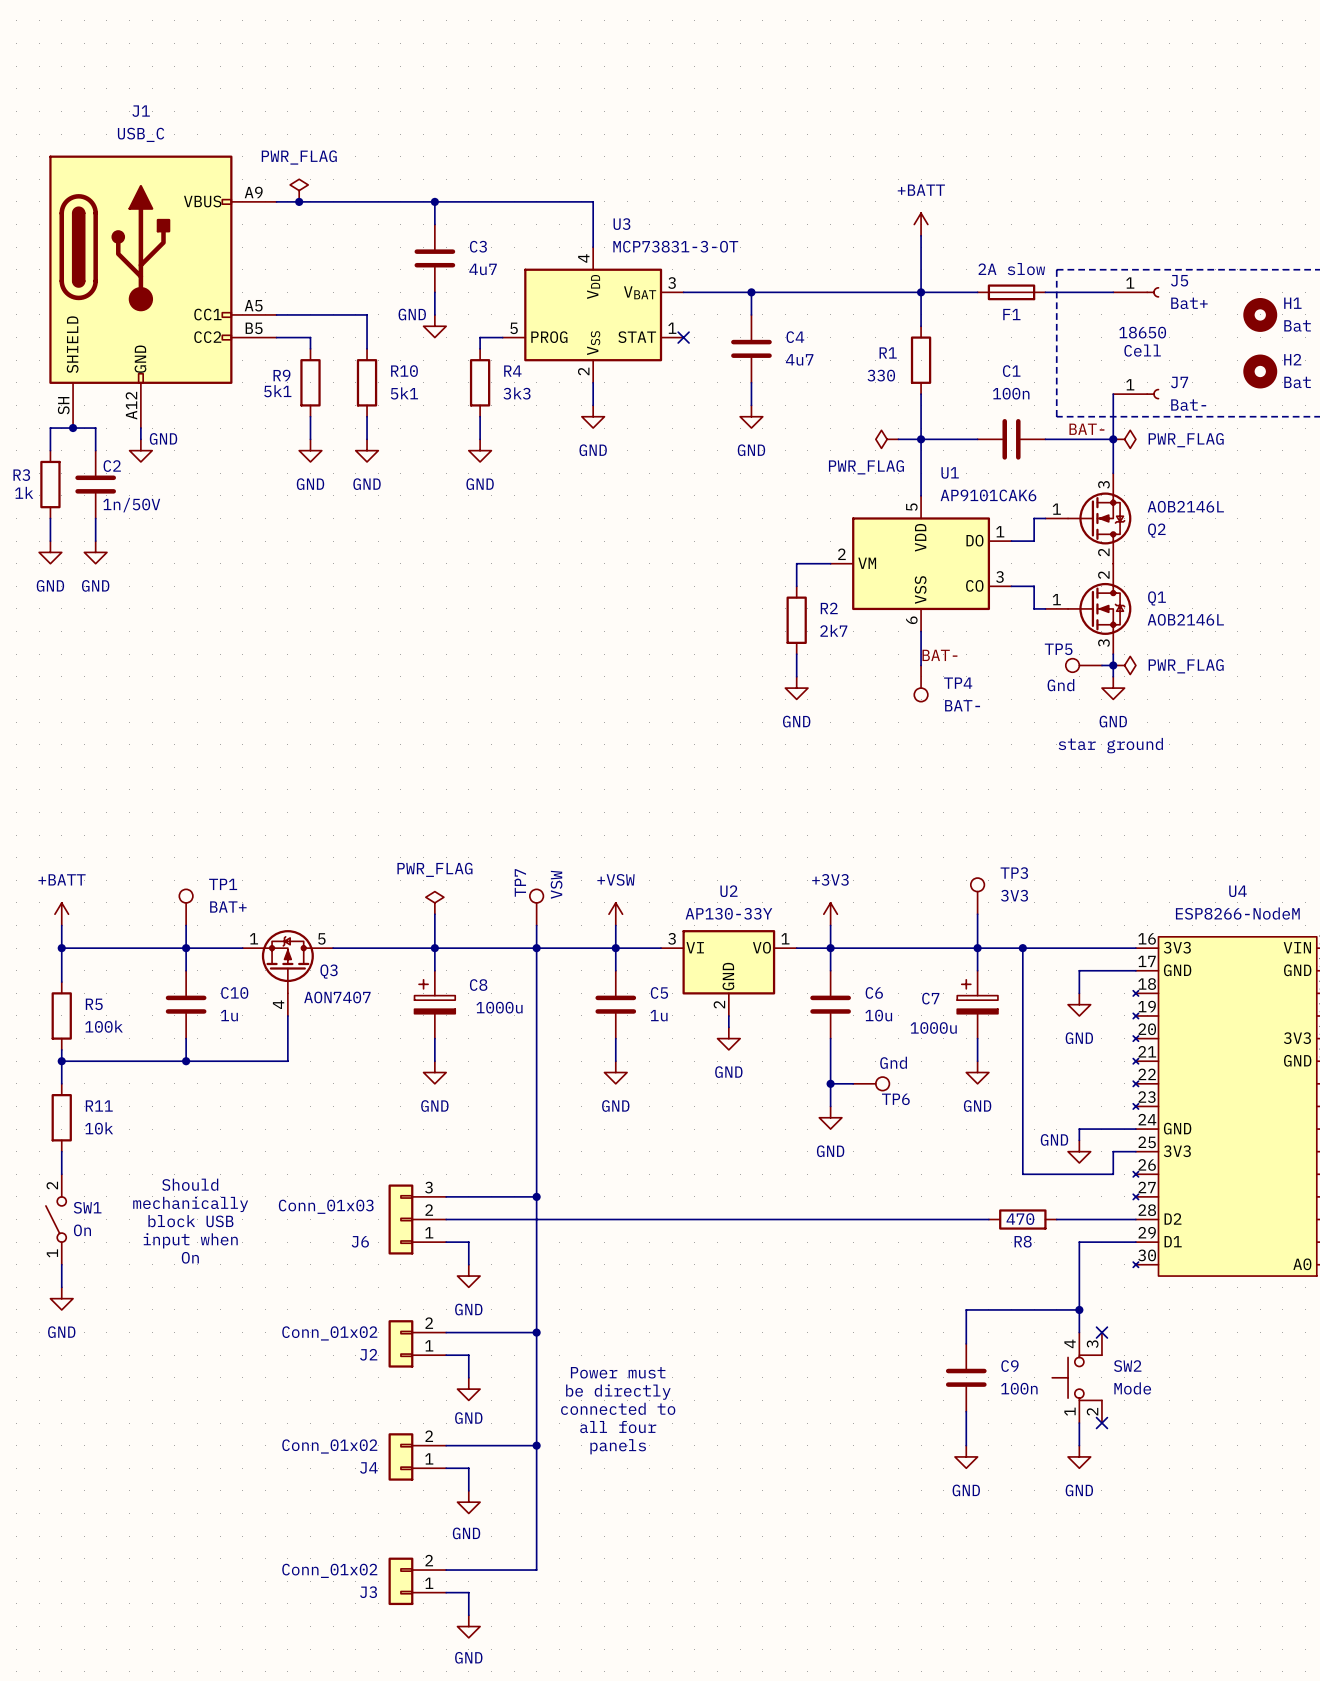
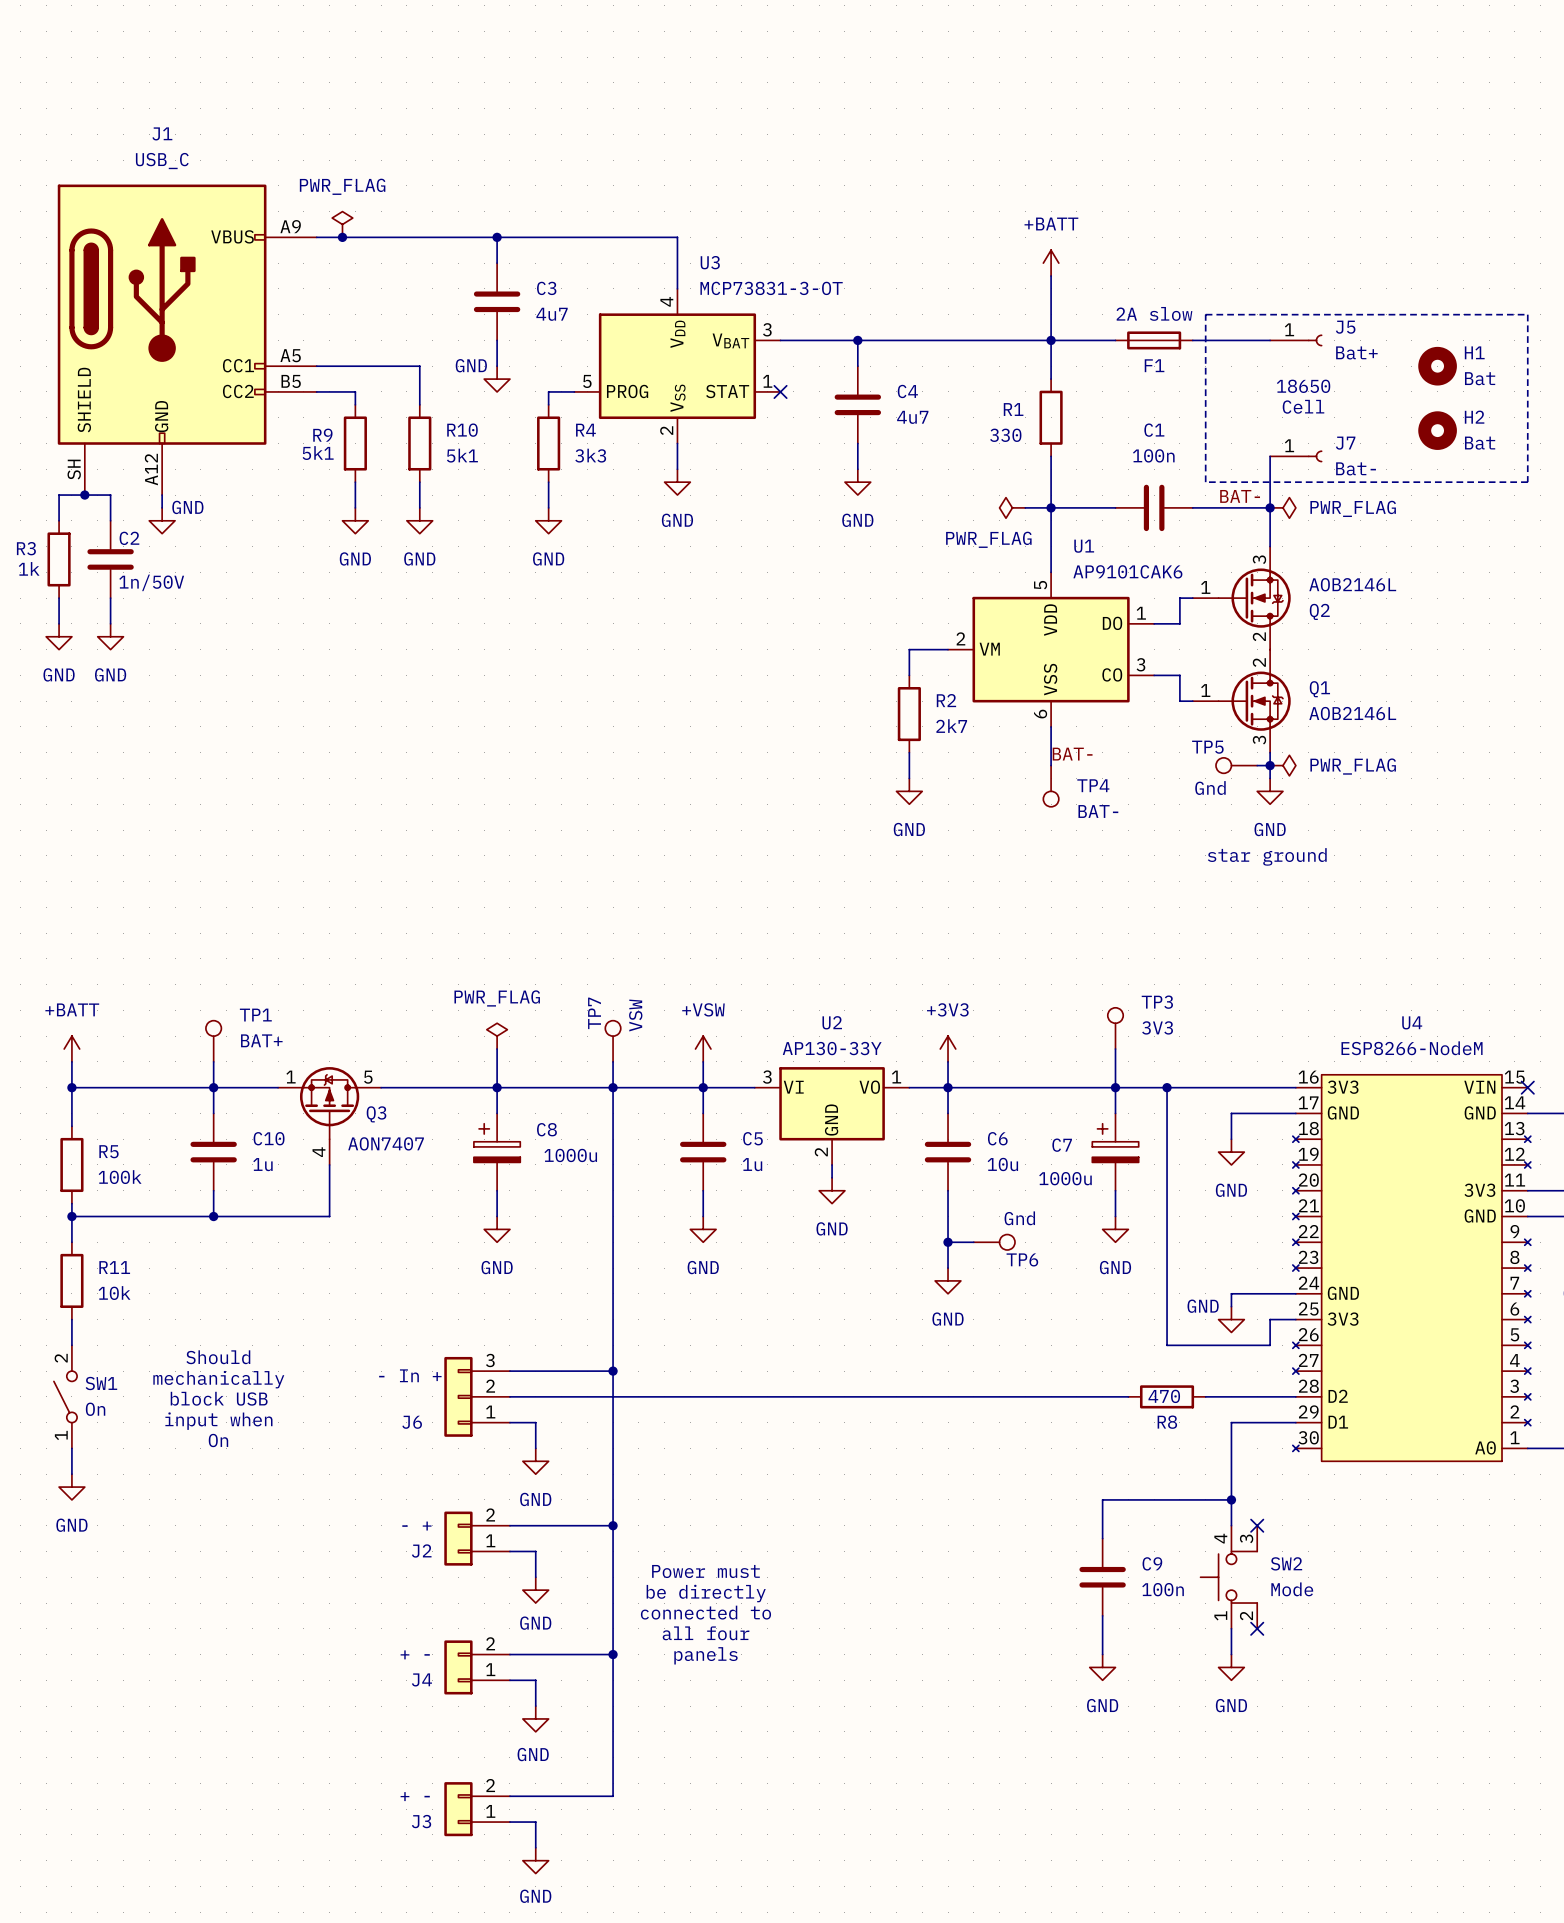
J6 value: Conn_01x03 (326, 1206) -> - In + (410, 1375)
J2 value: Conn_01x02 (329, 1333) -> - + (416, 1526)
J4 value: Conn_01x02 (329, 1446) -> + - (415, 1654)
J3 value: Conn_01x02 (329, 1570) -> + - (415, 1796)

